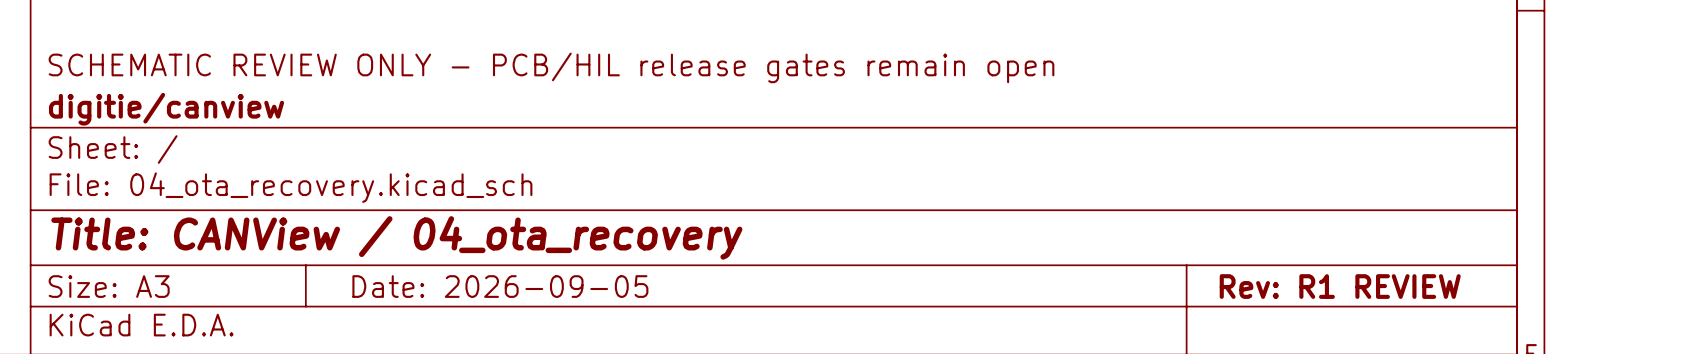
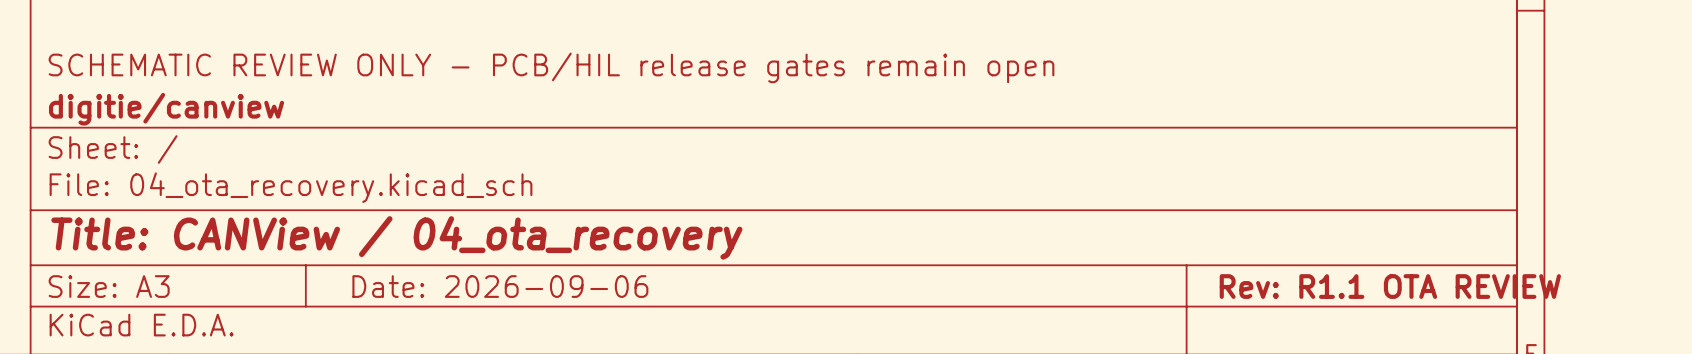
title block: Date: 2026-09-05 (500, 286) -> Date: 2026-09-06 (500, 286)
title block: Rev: R1 REVIEW (1340, 286) -> Rev: R1.1 OTA REVIEW (1390, 286)

